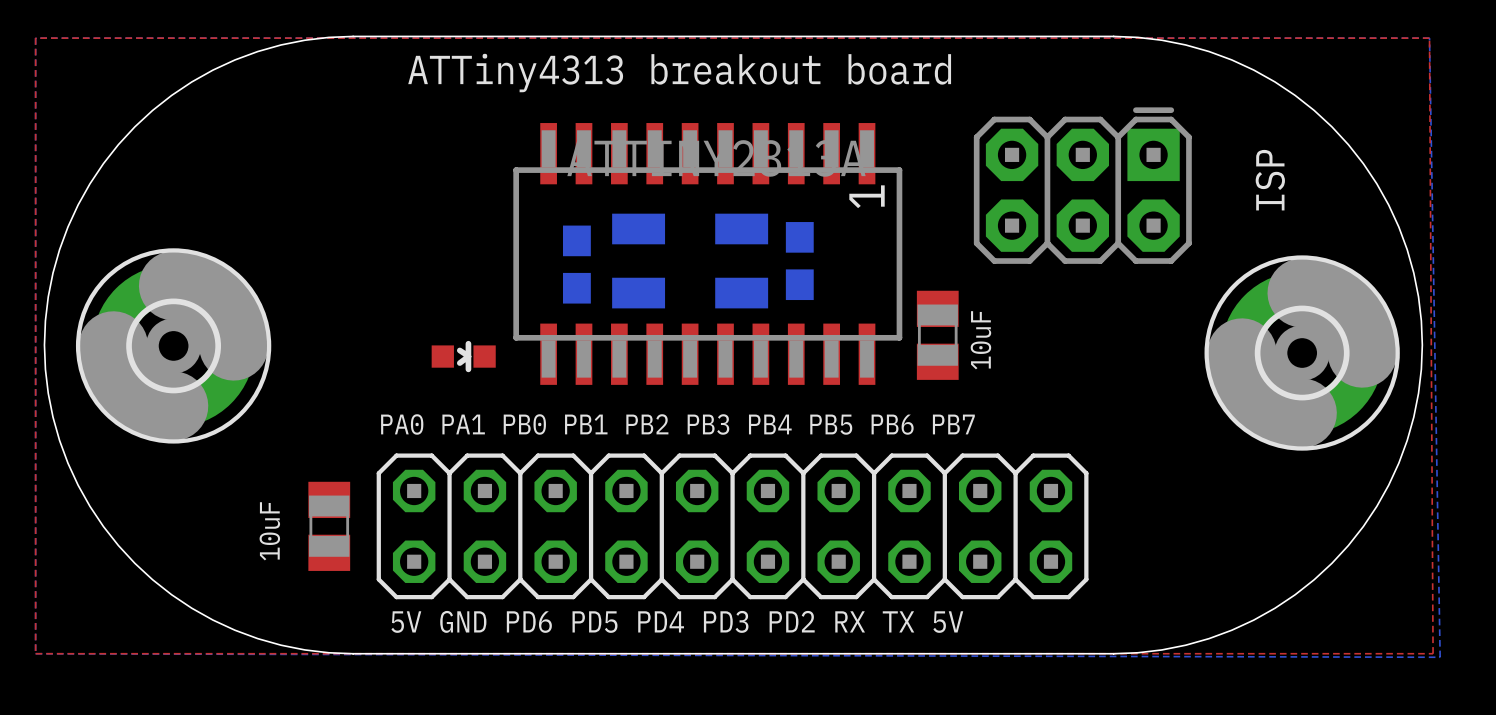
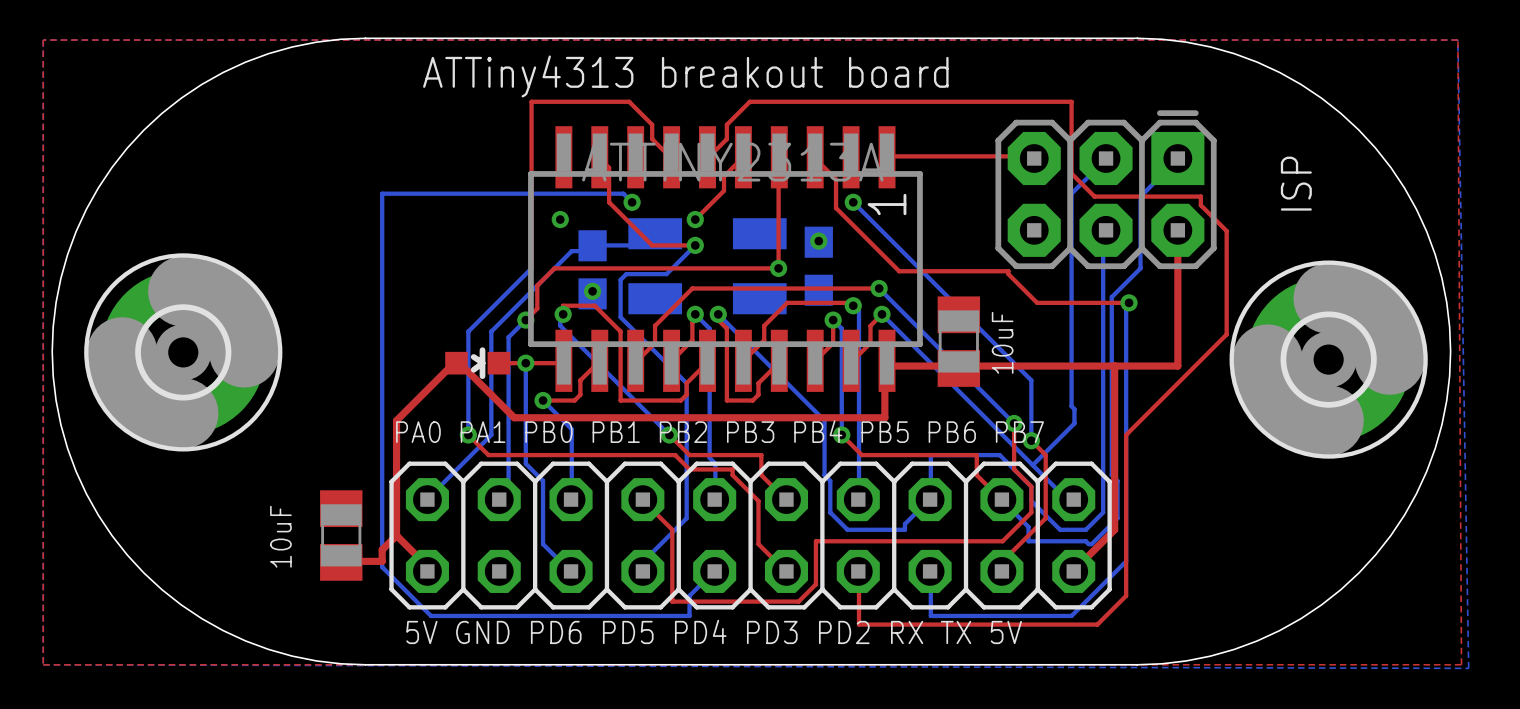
top track: none -> (599, 157) (609, 167) (609, 202) (652, 245) (695, 245)
top track: none -> (671, 157) (652, 139) (652, 124) (629, 101) (531, 101) (531, 268)
top track: none -> (707, 157) (726, 139) (726, 124) (749, 101) (1071, 101) (1071, 173) (1094, 196) (1200, 196) (1200, 205) (1226, 231) (1226, 334) (1126, 434) (1126, 595) (1097, 624) (859, 624) (858, 571)
top track: none -> (743, 157) (724, 176) (724, 190) (695, 219)
top track: none -> (779, 157) (778, 268) (554, 268) (537, 285) (537, 308) (525, 320)
top track: none -> (815, 157) (836, 179) (836, 208) (899, 271) (1008, 271) (1008, 274) (1037, 302) (1129, 302)
top track: none -> (887, 157) (1034, 156) (1034, 158)
bottom track: none -> (1106, 158) (1071, 193) (1071, 406) (1074, 409) (1074, 423) (1032, 465)
bottom track: none -> (1177, 158) (1140, 196) (1140, 268) (1111, 297) (1111, 475) (1117, 480) (1117, 518) (1091, 544) (1085, 541) (1028, 541) (1028, 526) (1001, 499)
bottom track: none -> (632, 202) (623, 193) (382, 193) (382, 567) (431, 615) (689, 615) (689, 595) (714, 571)
via: none -> (632, 202)
bottom track: none -> (853, 202) (1031, 380) (1031, 440)
via: none -> (853, 202)
via: none -> (560, 219)
via: none -> (695, 219)
bottom track: none -> (1106, 230) (1103, 233) (1103, 512) (1085, 529) (1060, 529) (1031, 501) (1031, 486) (999, 455) (930, 455) (930, 498) (904, 524) (904, 529) (847, 529) (830, 512) (830, 480) (824, 475) (824, 420) (718, 314)
top track: none -> (1177, 230) (1177, 366) (959, 366) (958, 368) (956, 366) (887, 366) (887, 360) (884, 366) (884, 417) (514, 417) (459, 363) (454, 363) (396, 420) (396, 535)
bottom track: none -> (655, 233) (655, 245) (594, 245) (592, 245) (591, 251) (571, 251) (491, 331) (491, 434) (427, 499)
via: none -> (818, 241)
bottom track: none -> (695, 245) (666, 274) (626, 274) (620, 279) (620, 317) (686, 383) (686, 518) (643, 561) (642, 571)
via: none -> (695, 245)
bottom track: none -> (531, 268) (468, 331) (468, 434)
via: none -> (778, 268)
top track: none -> (879, 288) (692, 288) (655, 325) (655, 343) (635, 360)
bottom track: none -> (879, 288) (1014, 423)
via: none -> (879, 288)
via: none -> (592, 291)
bottom track: none -> (1129, 302) (1126, 305) (1126, 561) (1071, 615) (930, 615) (930, 571)
via: none -> (1129, 302)
top track: none -> (853, 305) (853, 302) (787, 302) (764, 325) (764, 340) (743, 360)
bottom track: none -> (853, 305) (859, 311) (858, 499)
via: none -> (853, 305)
top track: none -> (563, 314) (563, 305) (594, 305) (620, 331) (620, 400) (680, 400) (686, 394) (686, 383) (707, 360)
bottom track: none -> (563, 314) (560, 317) (560, 325) (669, 434)
via: none -> (563, 314)
top track: none -> (695, 314) (695, 320) (692, 322) (692, 340) (671, 360)
bottom track: none -> (695, 314) (709, 328) (709, 457) (715, 463) (714, 499)
via: none -> (695, 314)
top track: none -> (718, 314) (718, 320) (726, 328) (726, 400) (752, 400) (758, 394) (758, 383) (779, 360)
via: none -> (718, 314)
top track: none -> (881, 314) (870, 325) (870, 343) (851, 360)
bottom track: none -> (881, 314) (1065, 498) (1073, 499)
via: none -> (881, 314)
bottom track: none -> (525, 320) (508, 337) (508, 489) (499, 499)
via: none -> (525, 320)
top track: none -> (833, 320) (833, 343) (815, 360)
bottom track: none -> (833, 320) (841, 328) (841, 434)
via: none -> (833, 320)
top track: none -> (563, 360) (563, 363) (498, 363)
top track: none -> (599, 360) (580, 380) (580, 394) (574, 400) (543, 400)
bottom track: none -> (525, 363) (525, 463) (543, 480) (543, 544) (571, 571)
via: none -> (525, 363)
top track: none -> (1114, 366) (1114, 529) (1073, 571)
bottom track: none -> (543, 400) (571, 429) (571, 499)
via: none -> (543, 400)
top track: none -> (1014, 423) (1014, 469) (1031, 486) (1031, 512) (1002, 541) (815, 541) (815, 584) (798, 601) (672, 601) (672, 529) (642, 499)
via: none -> (1014, 423)
top track: none -> (468, 434) (488, 455) (675, 455) (689, 469) (732, 469) (732, 475) (758, 501) (758, 544) (786, 571)
via: none -> (468, 434)
top track: none -> (669, 434) (689, 455) (761, 455) (761, 475) (786, 499)
via: none -> (669, 434)
top track: none -> (841, 434) (861, 455) (976, 455) (976, 475) (1001, 499)
via: none -> (841, 434)
top track: none -> (1031, 440) (1045, 455) (1045, 518) (1002, 561) (1001, 571)
via: none -> (1031, 440)
top track: none -> (396, 535) (425, 564) (425, 569) (427, 571)
top track: none -> (396, 535) (393, 535) (393, 538) (382, 549) (382, 561) (341, 562)

